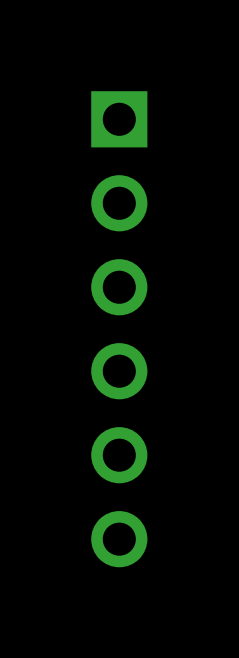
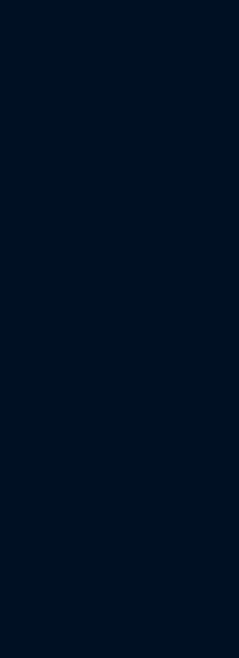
part: (119, 329) -> none

